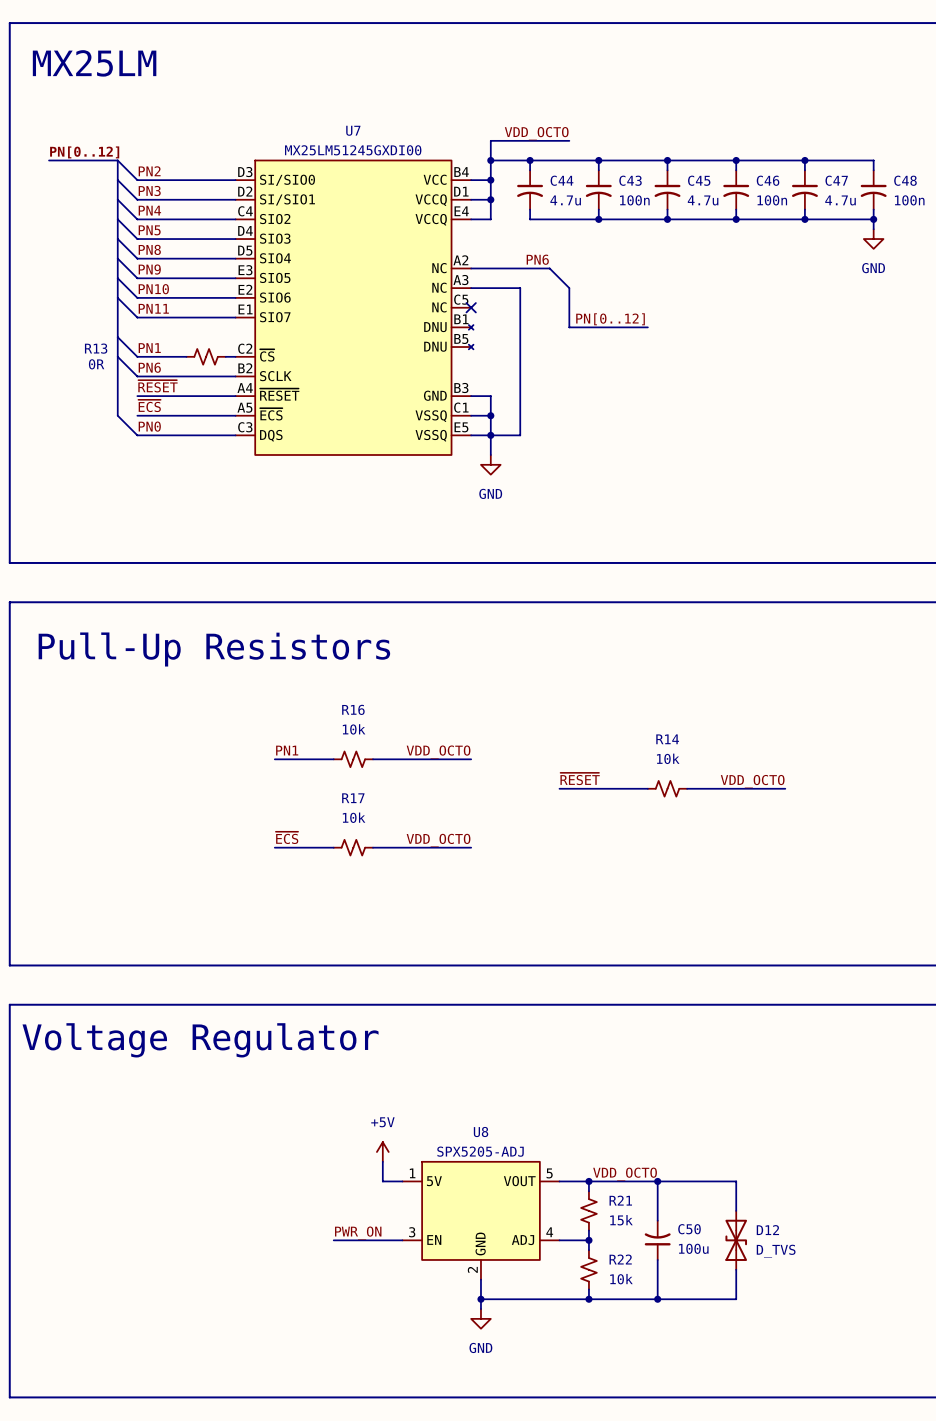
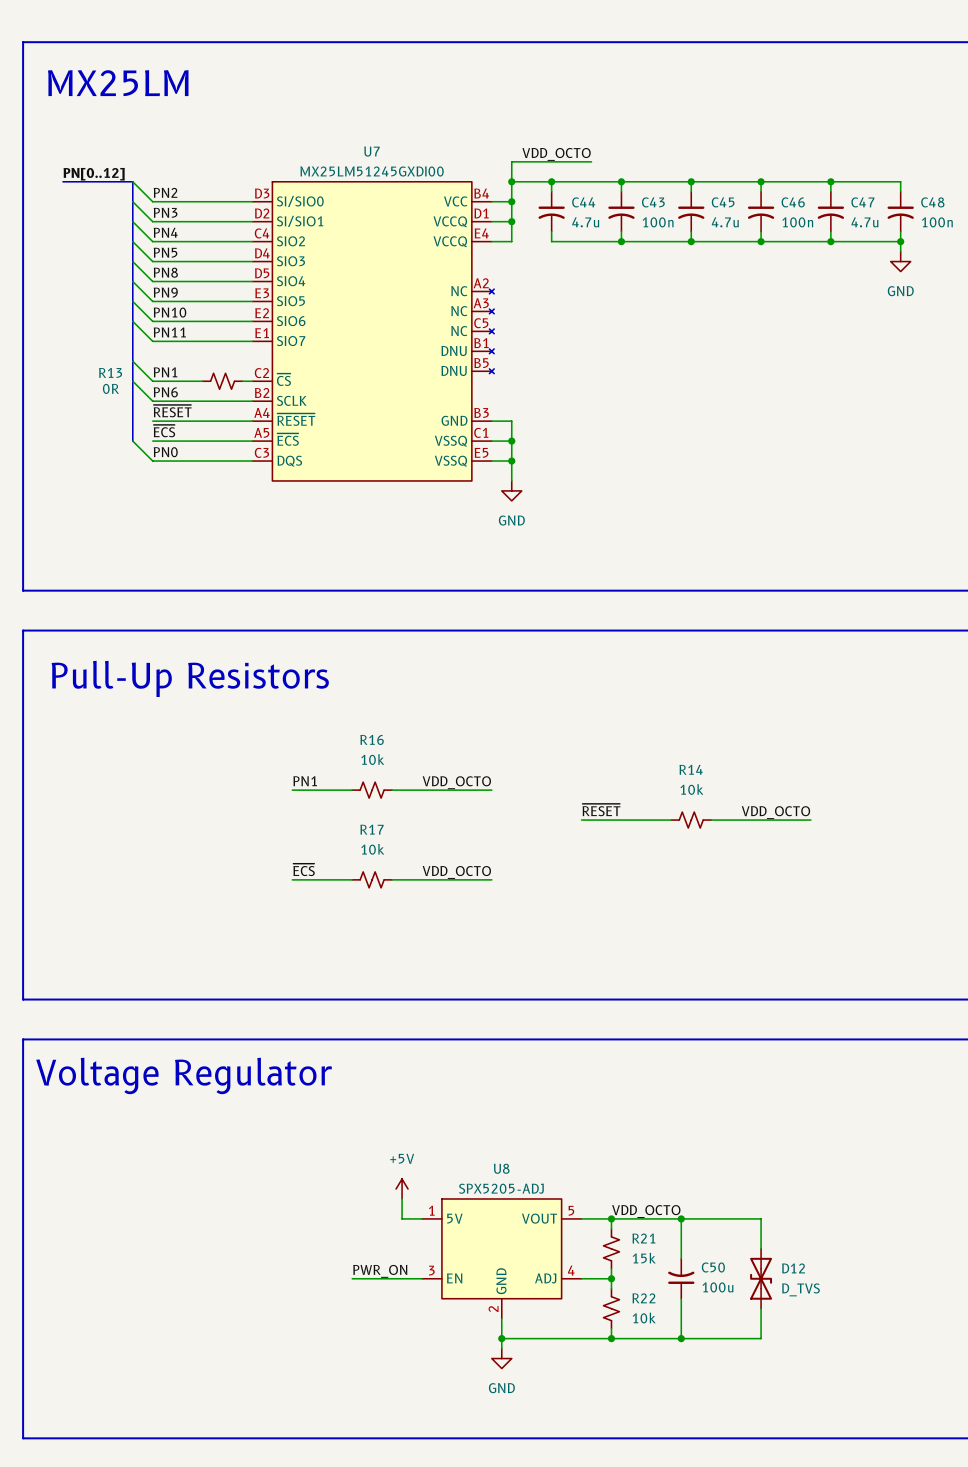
U7 symbol: [235, 160, 474, 455] -> [252, 181, 495, 481]
label: PN6 (537, 259) -> none
wire: (471, 268) (549, 268) (569, 288) -> none
wire: (471, 288) (520, 288) (520, 435) (490, 435) -> none
bus: (569, 288) (569, 327) (647, 327) -> none
no-connect mark: (471, 307) -> none
label: PN[0..12] (610, 319) -> none

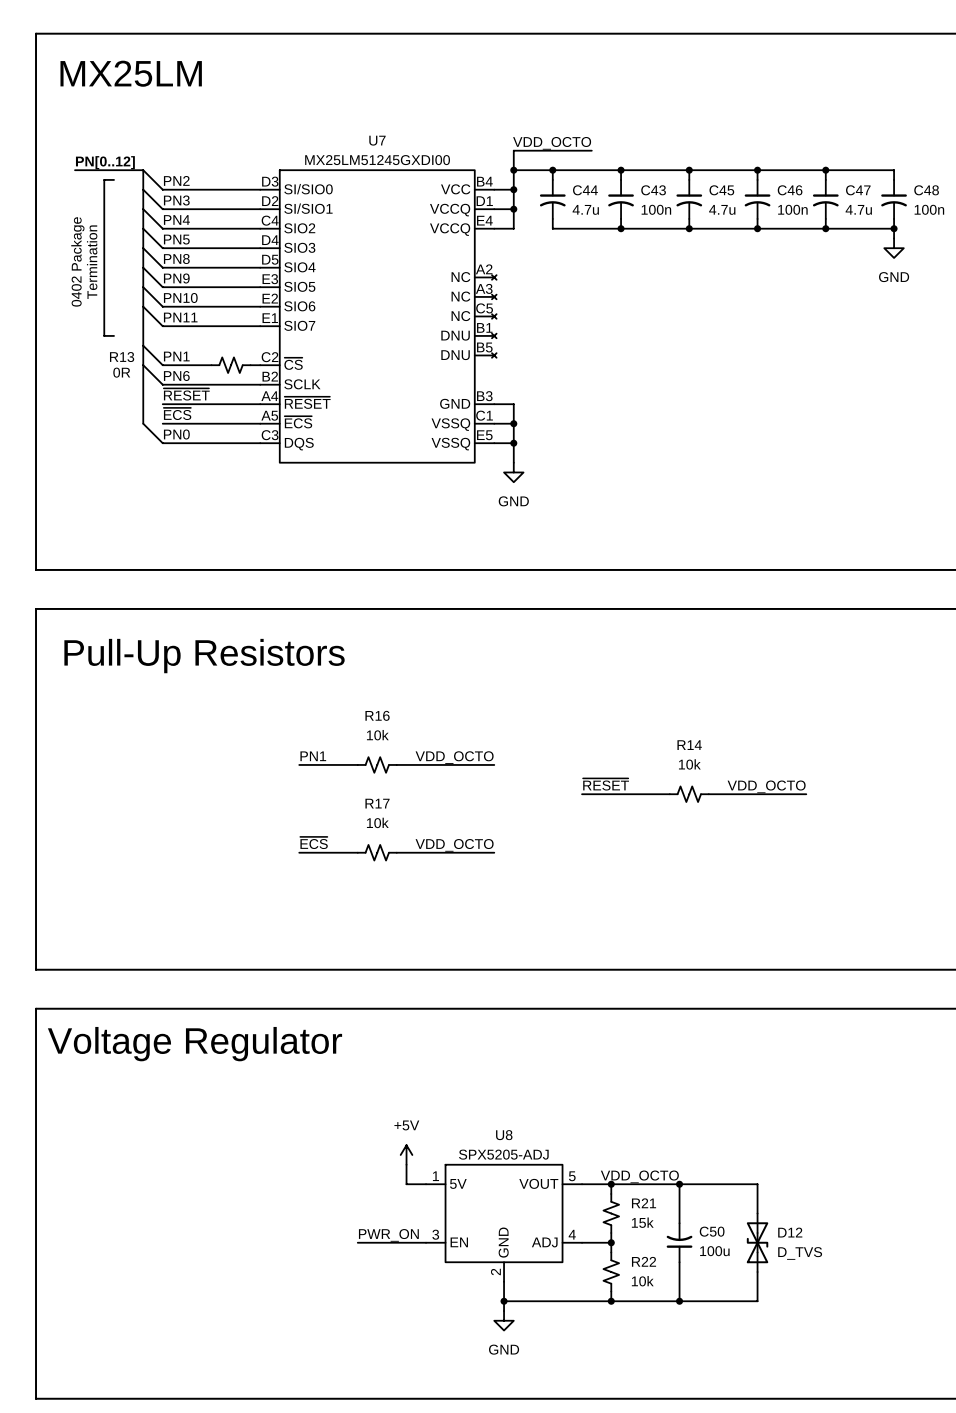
line: none -> (114, 179) (104, 179) (104, 335) (114, 335)
text: none -> 0402 Package (77, 261)
text: none -> Termination (92, 262)

